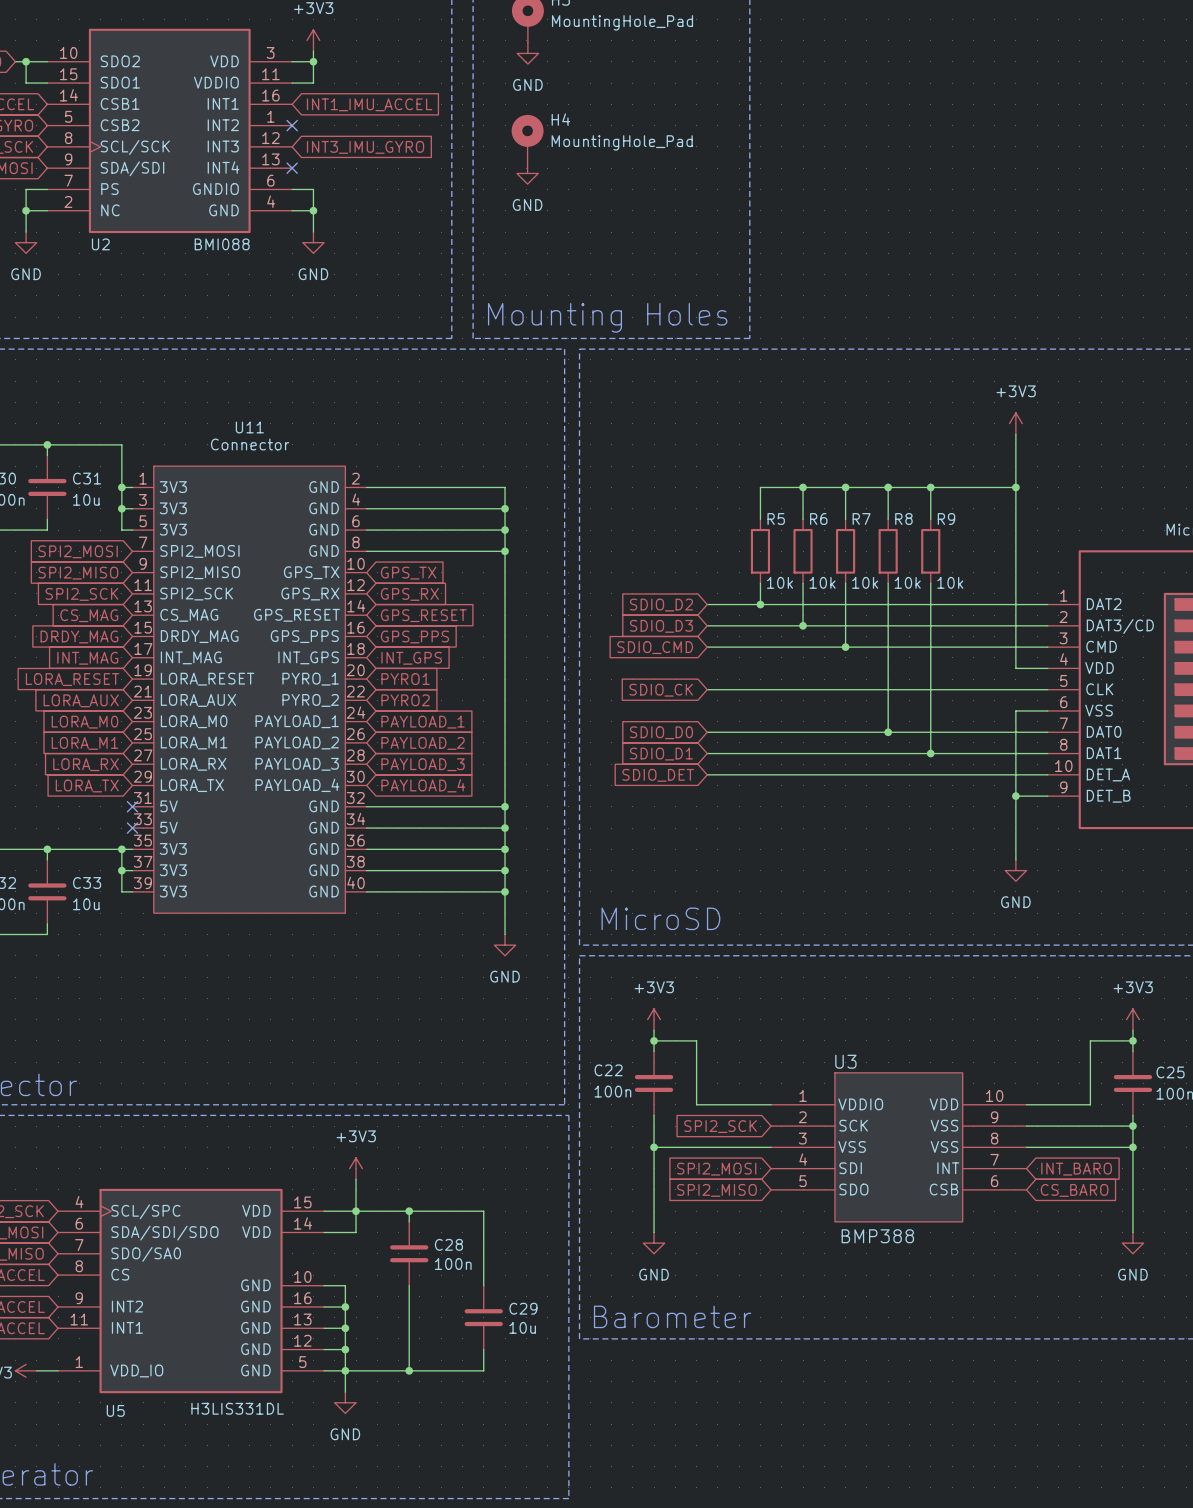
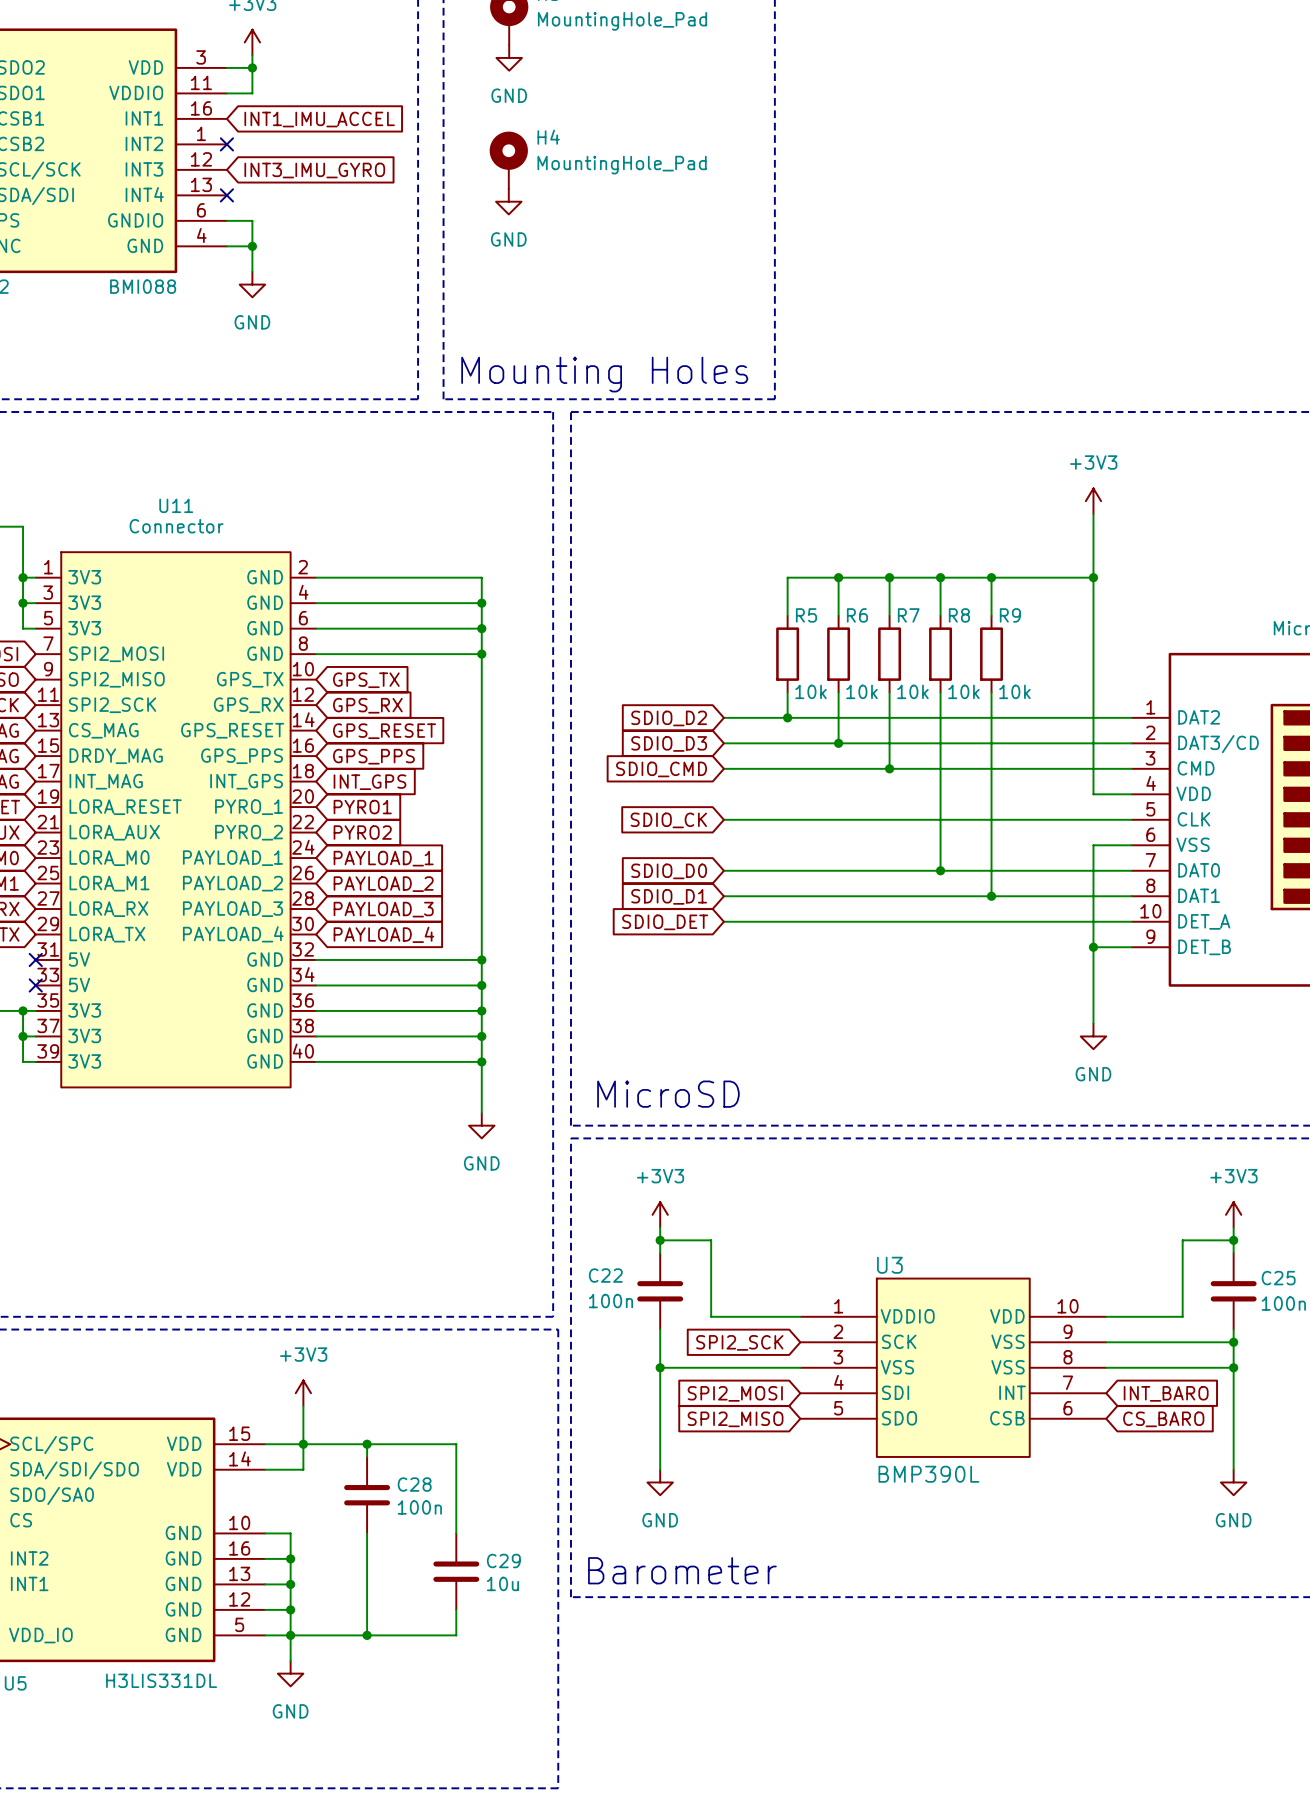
U3 value: BMP388 (877, 1236) -> BMP390L (928, 1474)

